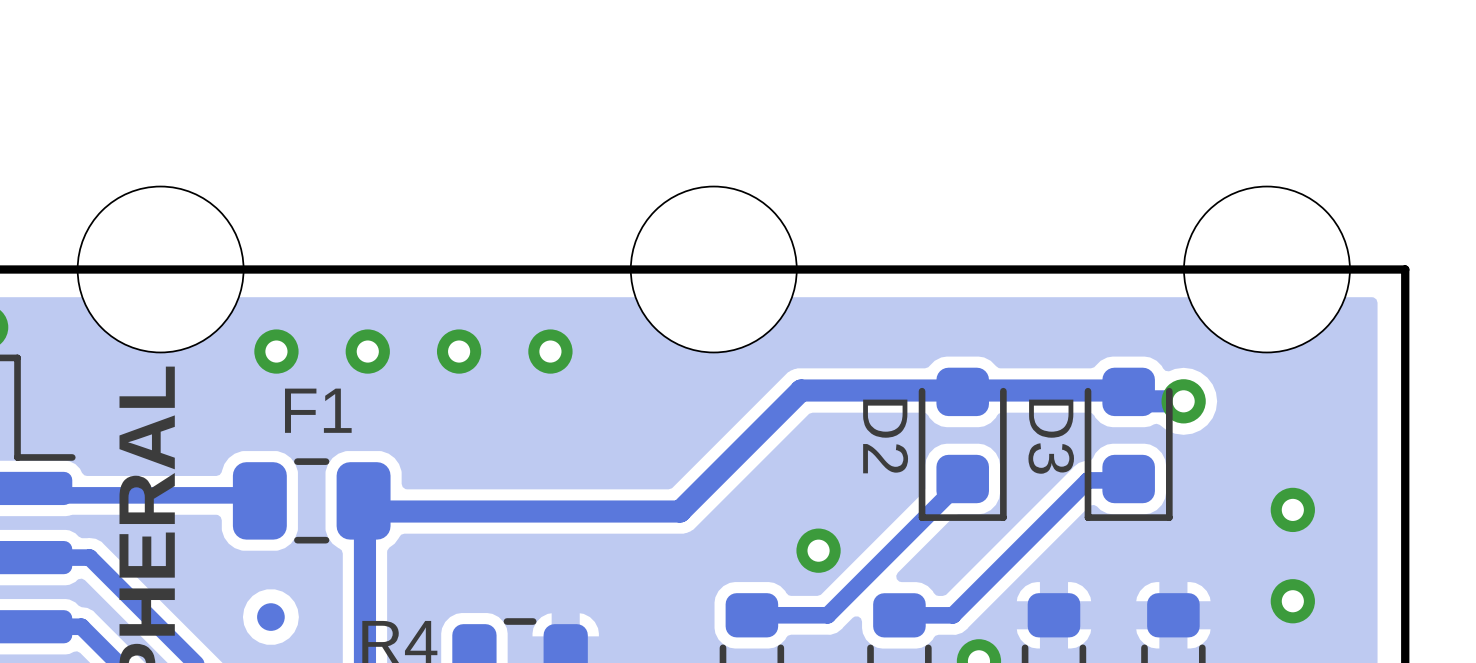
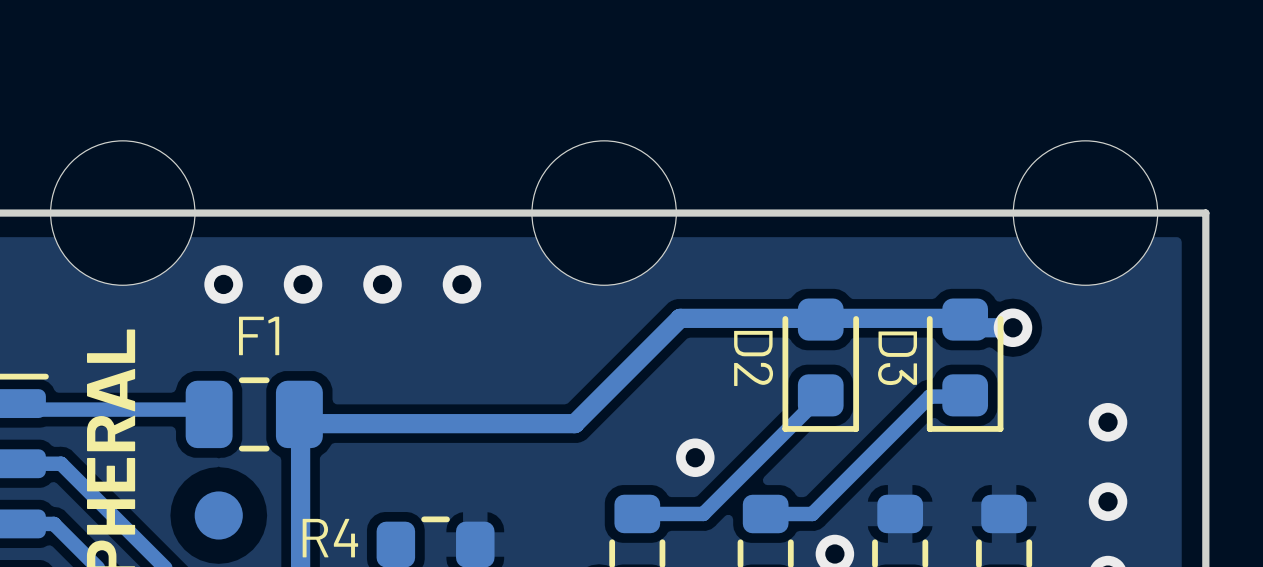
part footprint: [257, 603, 285, 631] -> [194, 491, 243, 540]

